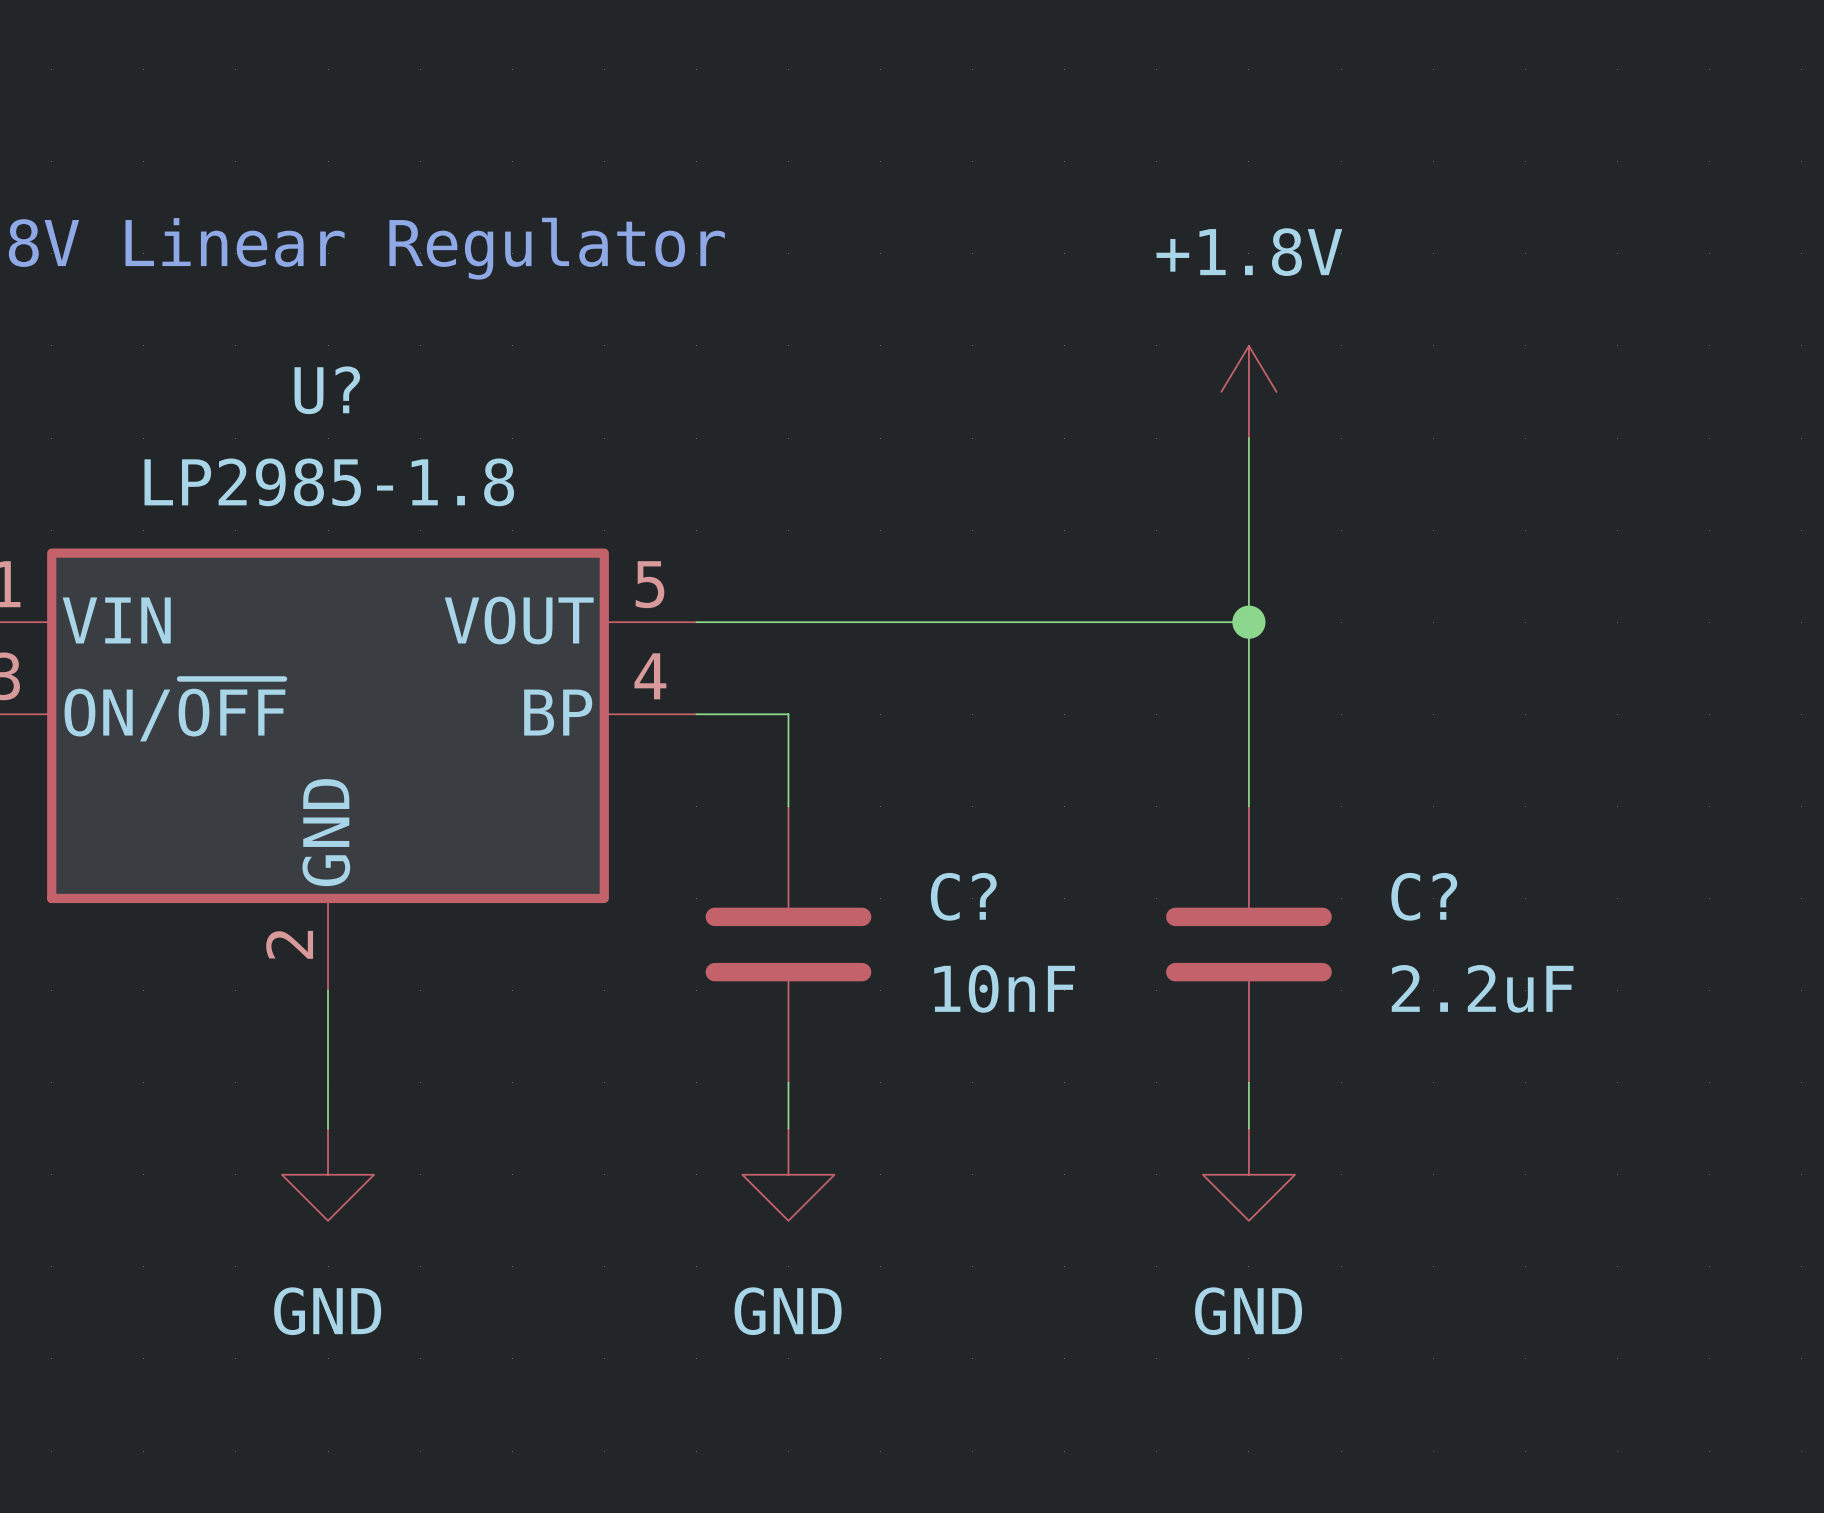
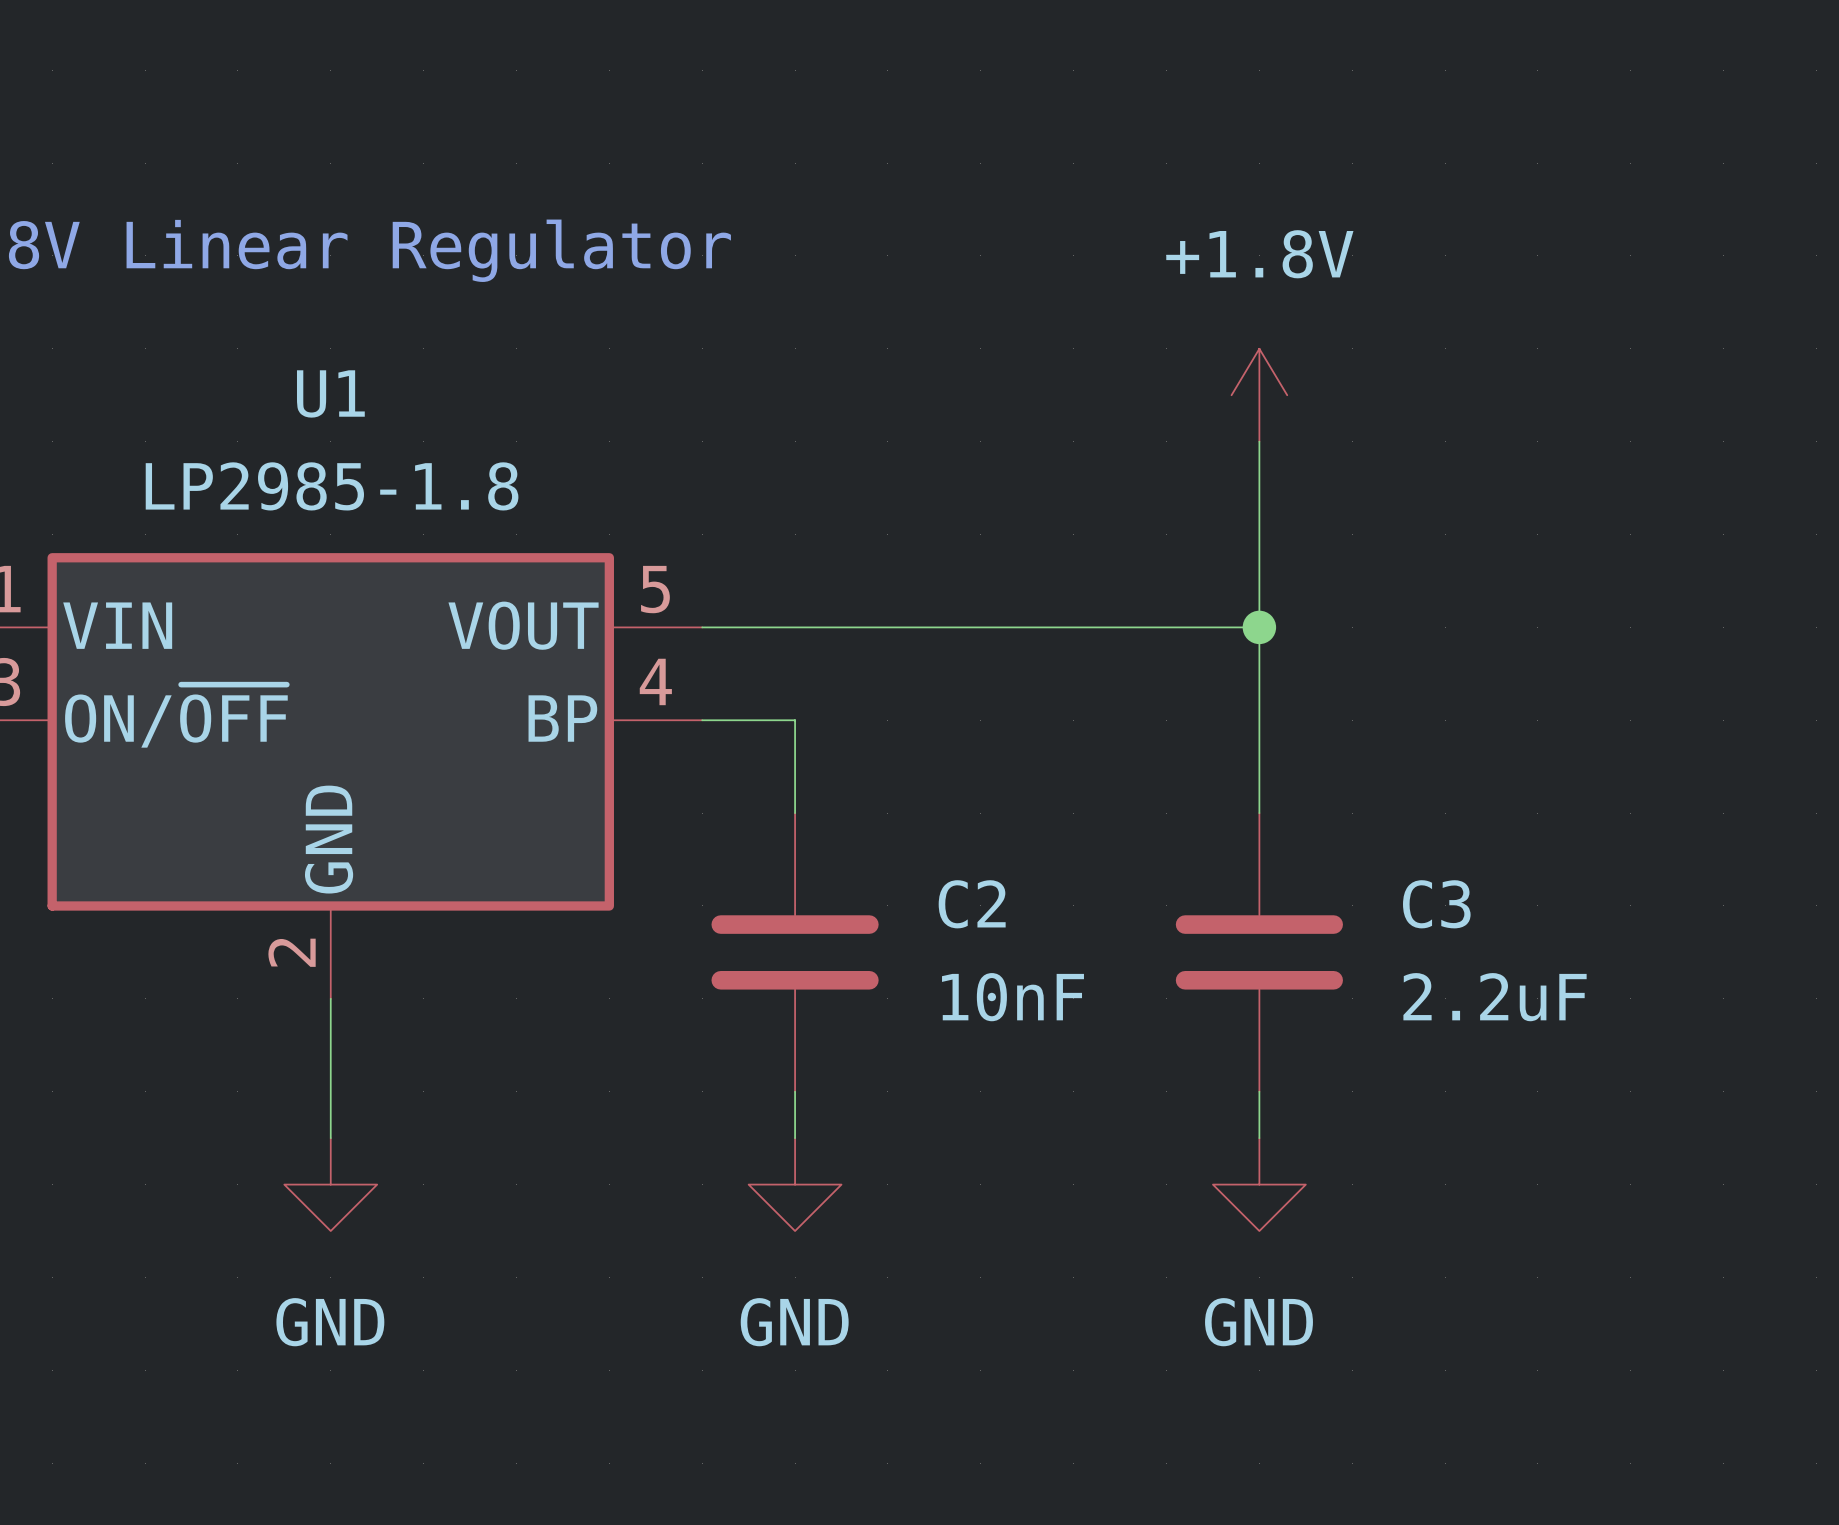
U? name: U? (327, 390) -> U1 (330, 393)
C? name: C? (963, 896) -> C2 (972, 904)
C? name: C? (1424, 896) -> C3 (1436, 904)

